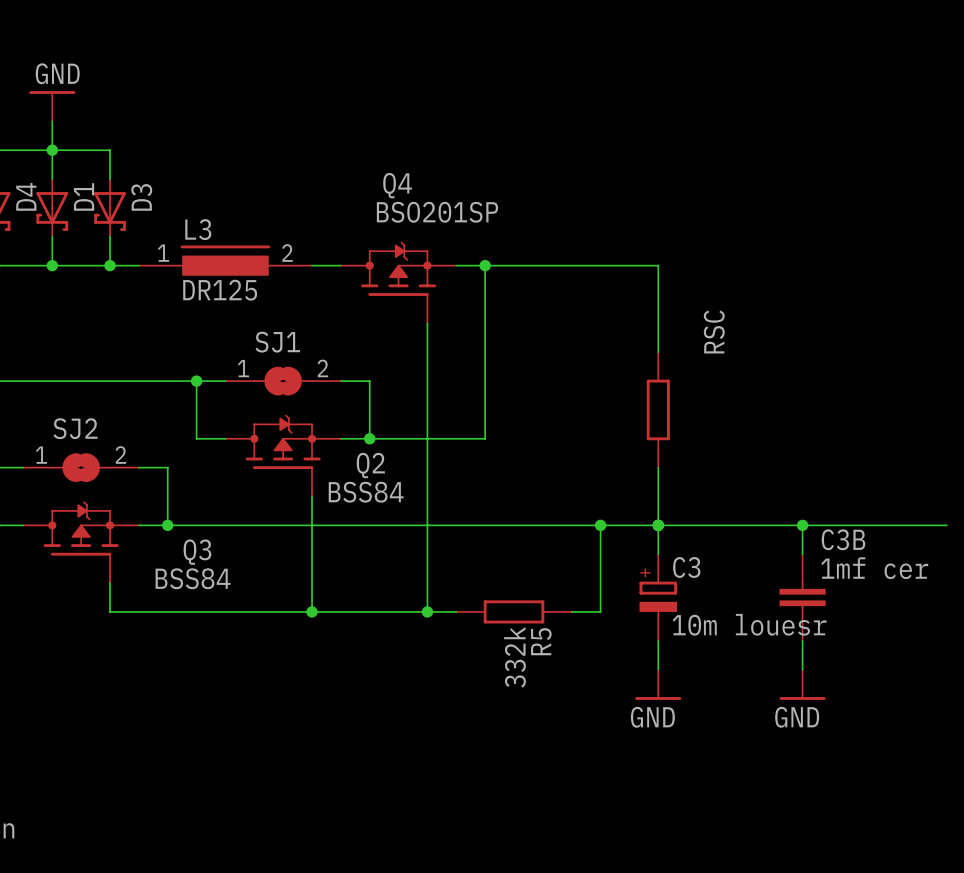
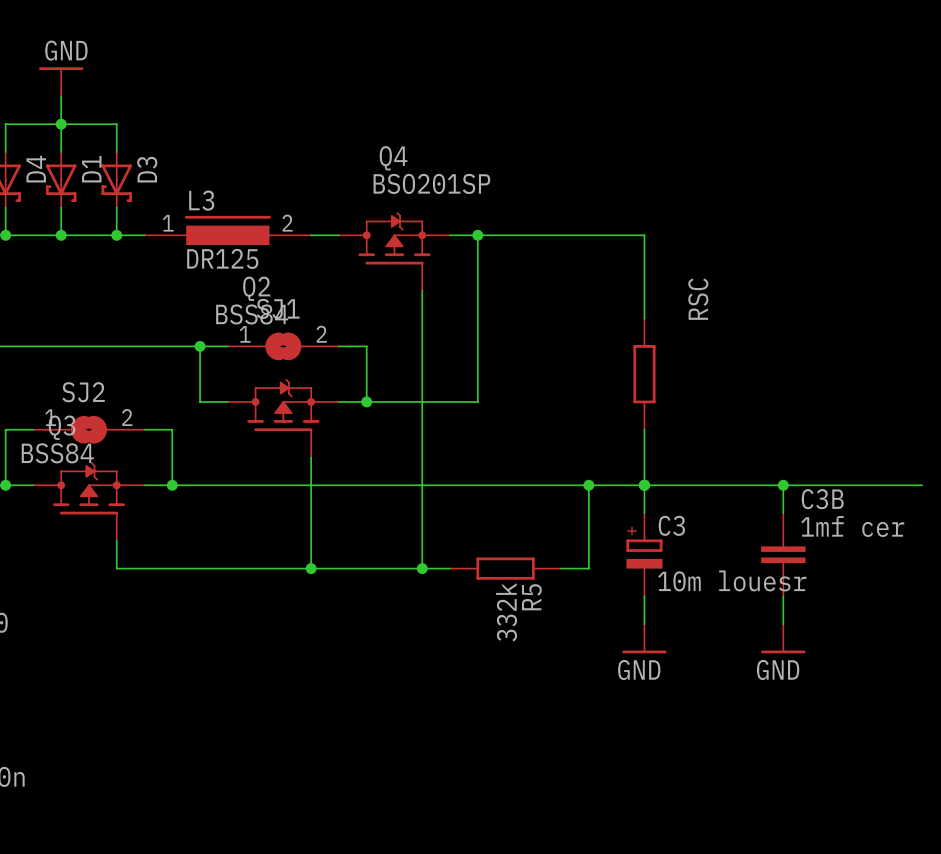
Q2 name position: Q2 (370, 465) -> Q2 (256, 288)
Q2 value position: BSS84 (366, 492) -> BSS84 (252, 314)
Q3 name position: Q3 (197, 552) -> Q3 (62, 427)
Q3 value position: BSS84 (193, 578) -> BSS84 (57, 453)

